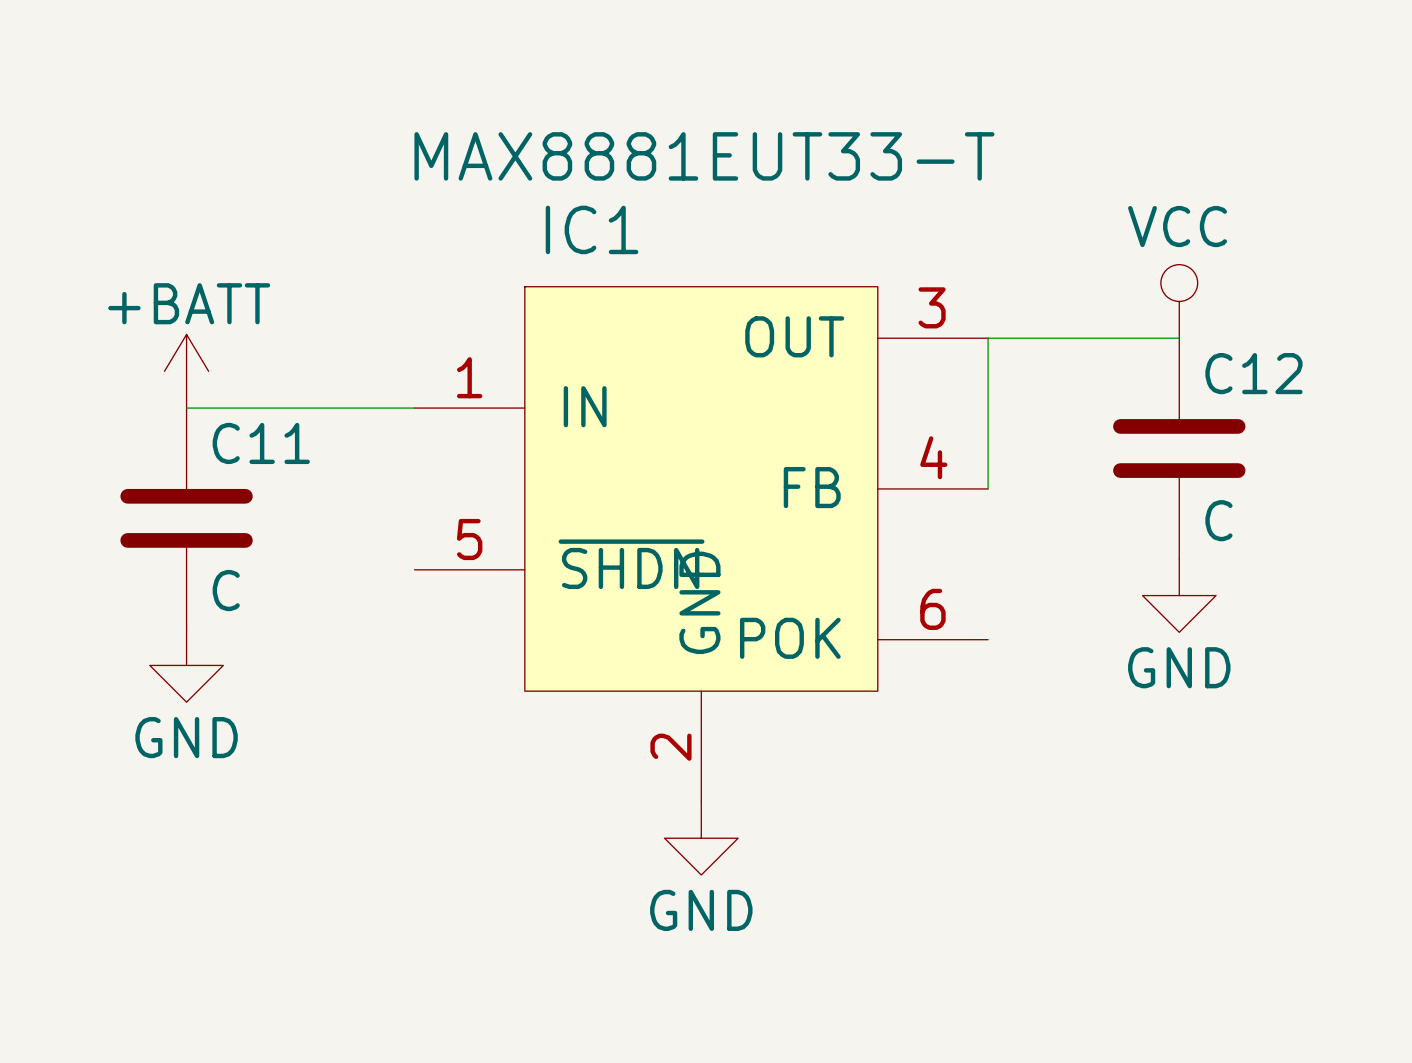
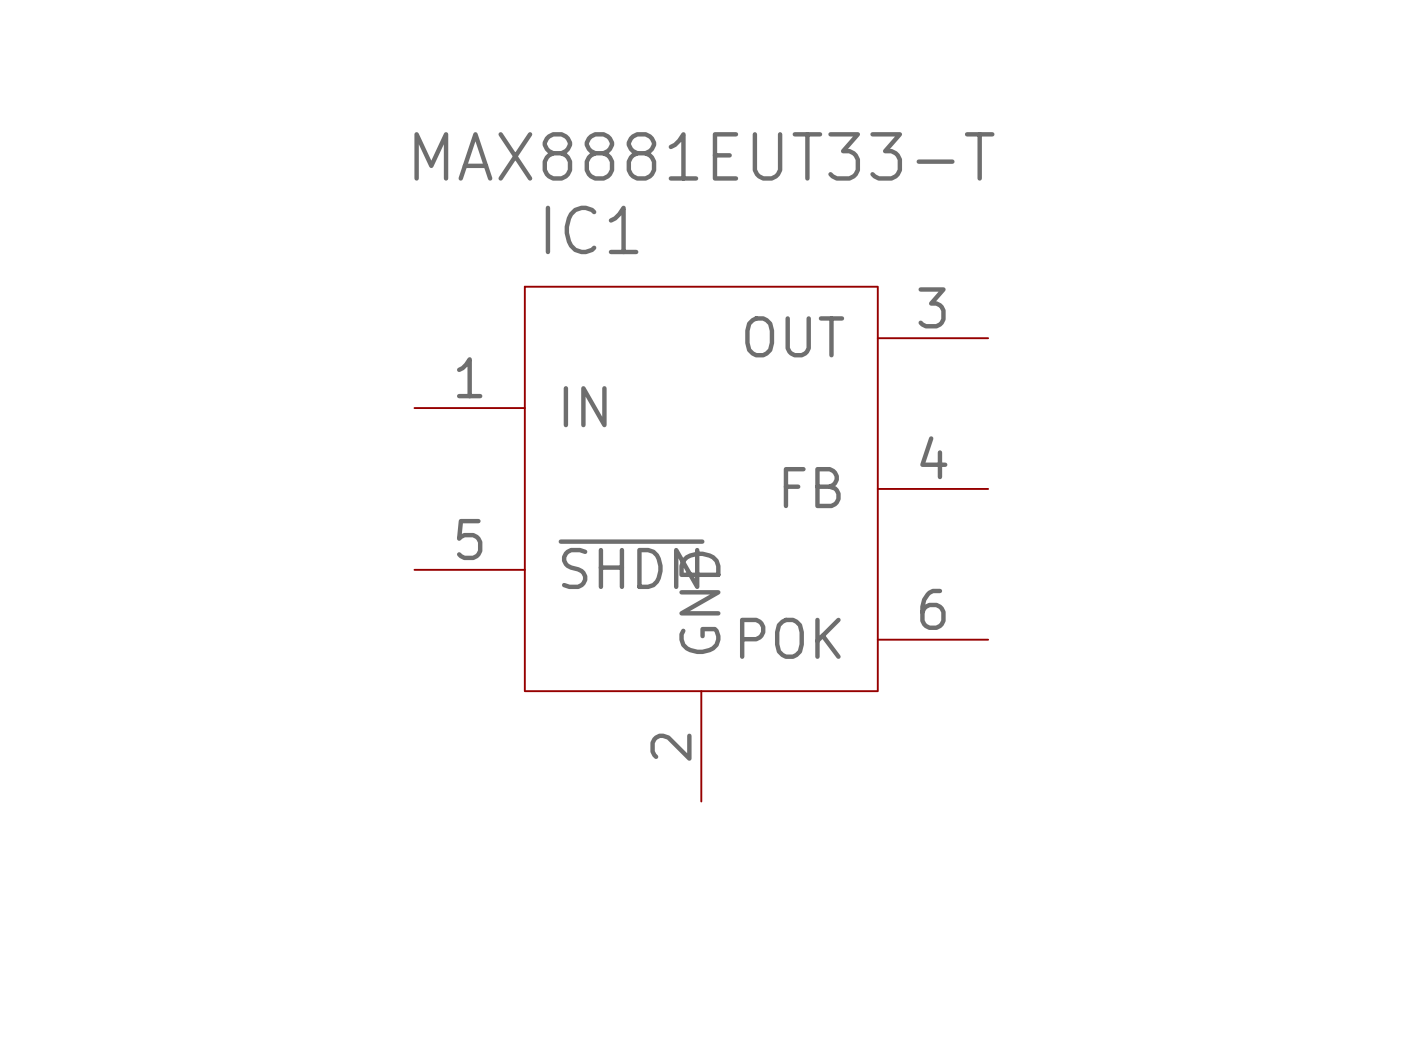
power symbol: VCC (1179, 301) -> none
wire: (1179, 338) (988, 338) (988, 488) -> none
power symbol: +BATT (186, 371) -> none
wire: (186, 408) (414, 408) -> none
C12: C (1179, 448) -> none
C11: C (186, 518) -> none
power symbol: GND (1179, 595) -> none
power symbol: GND (186, 665) -> none
power symbol: GND (701, 838) -> none

